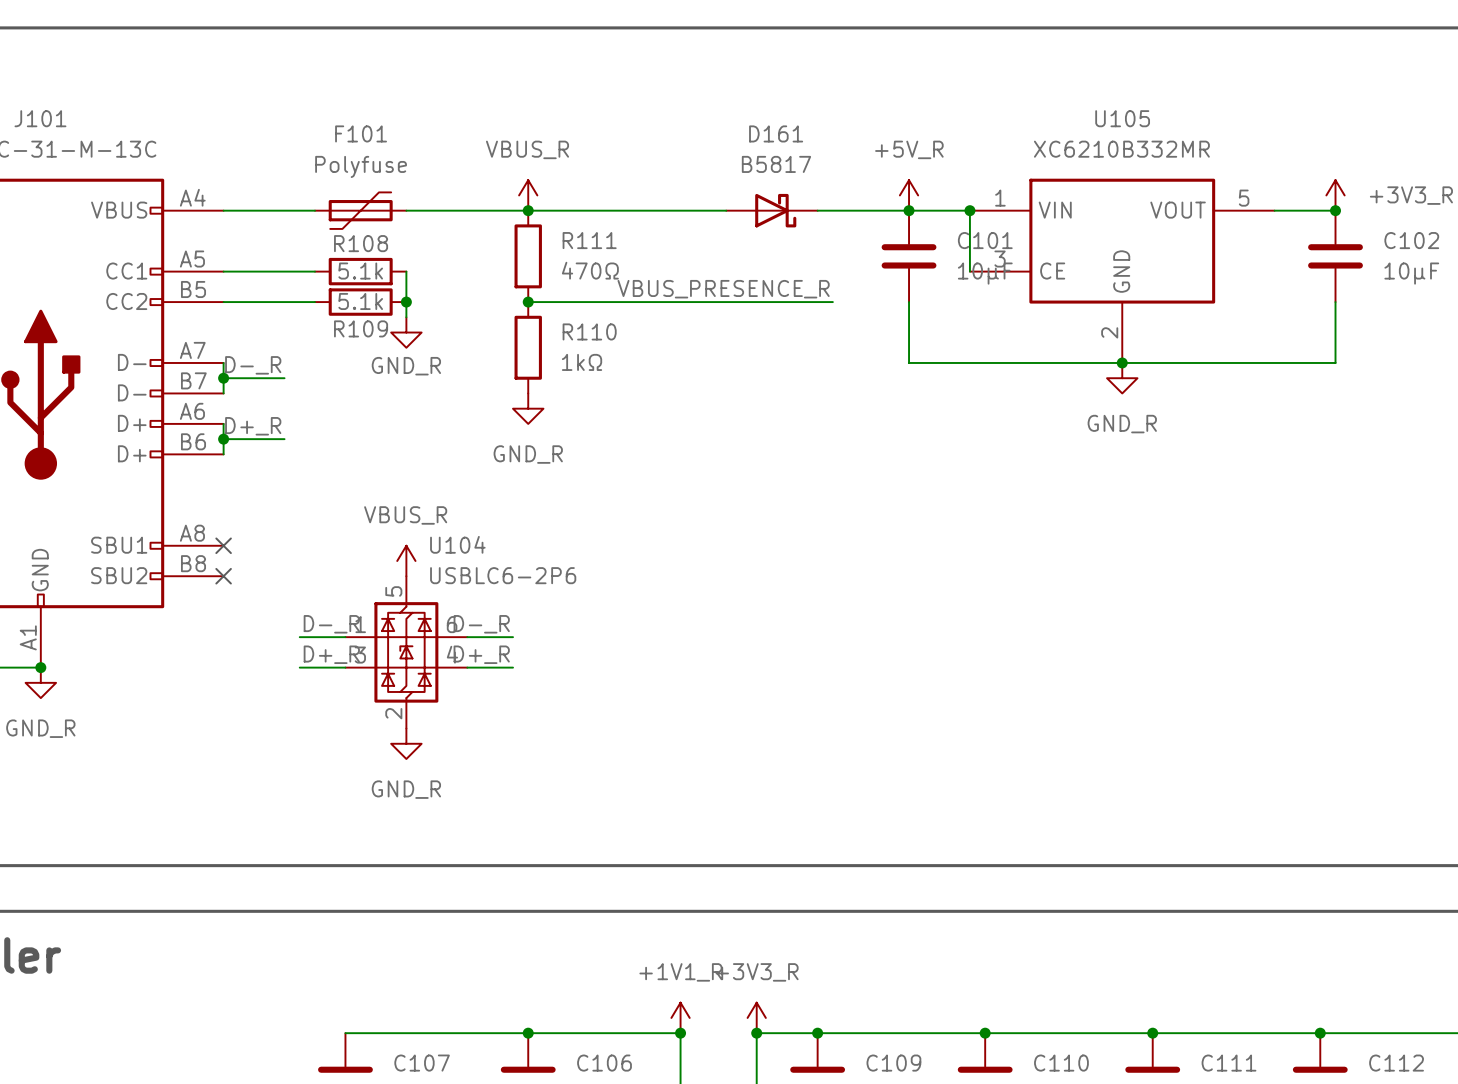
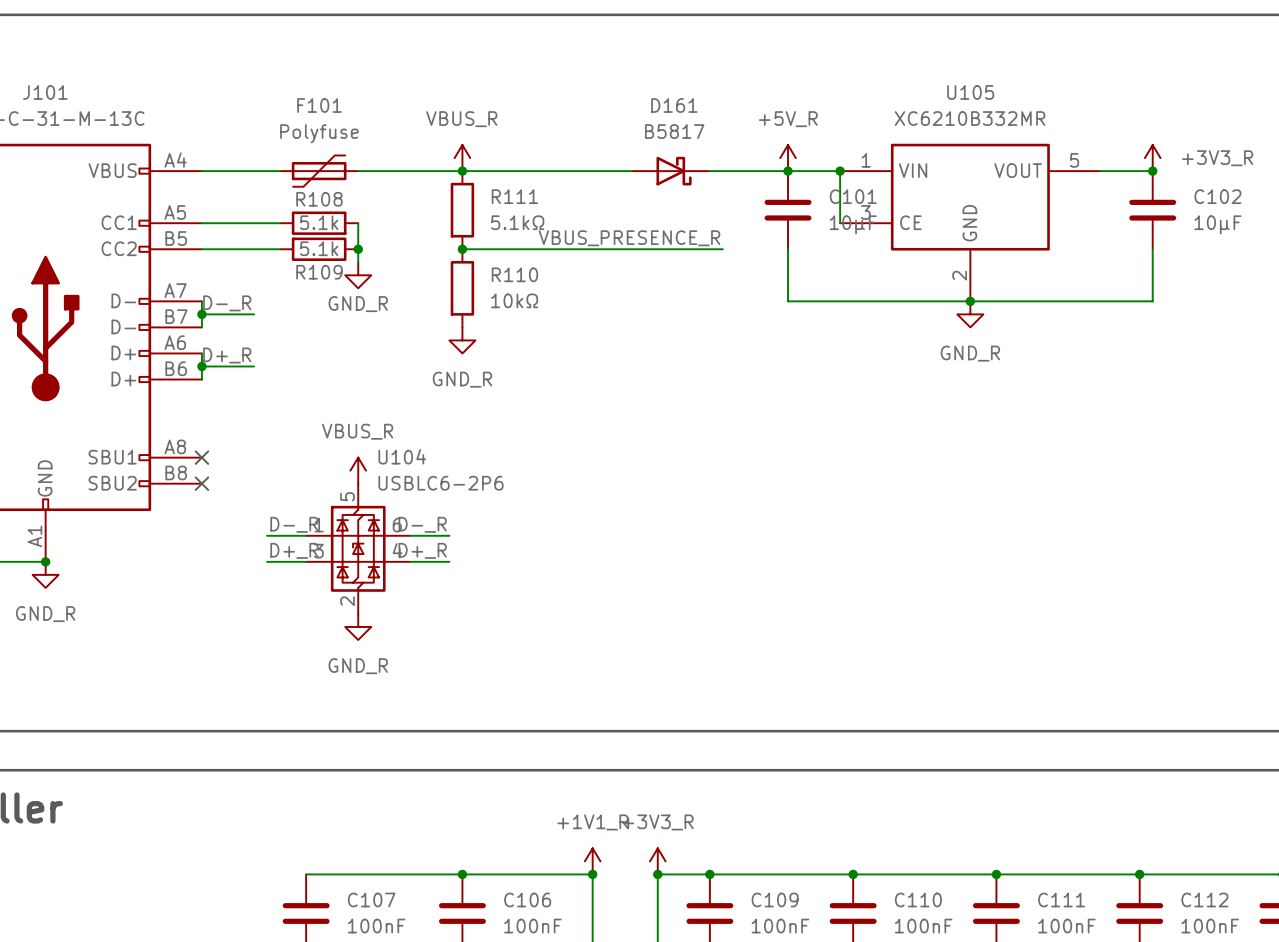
R111 value: 470Ω (590, 270) -> 5.1kΩ (517, 222)
R110 value: 1kΩ (582, 362) -> 10kΩ (514, 300)

